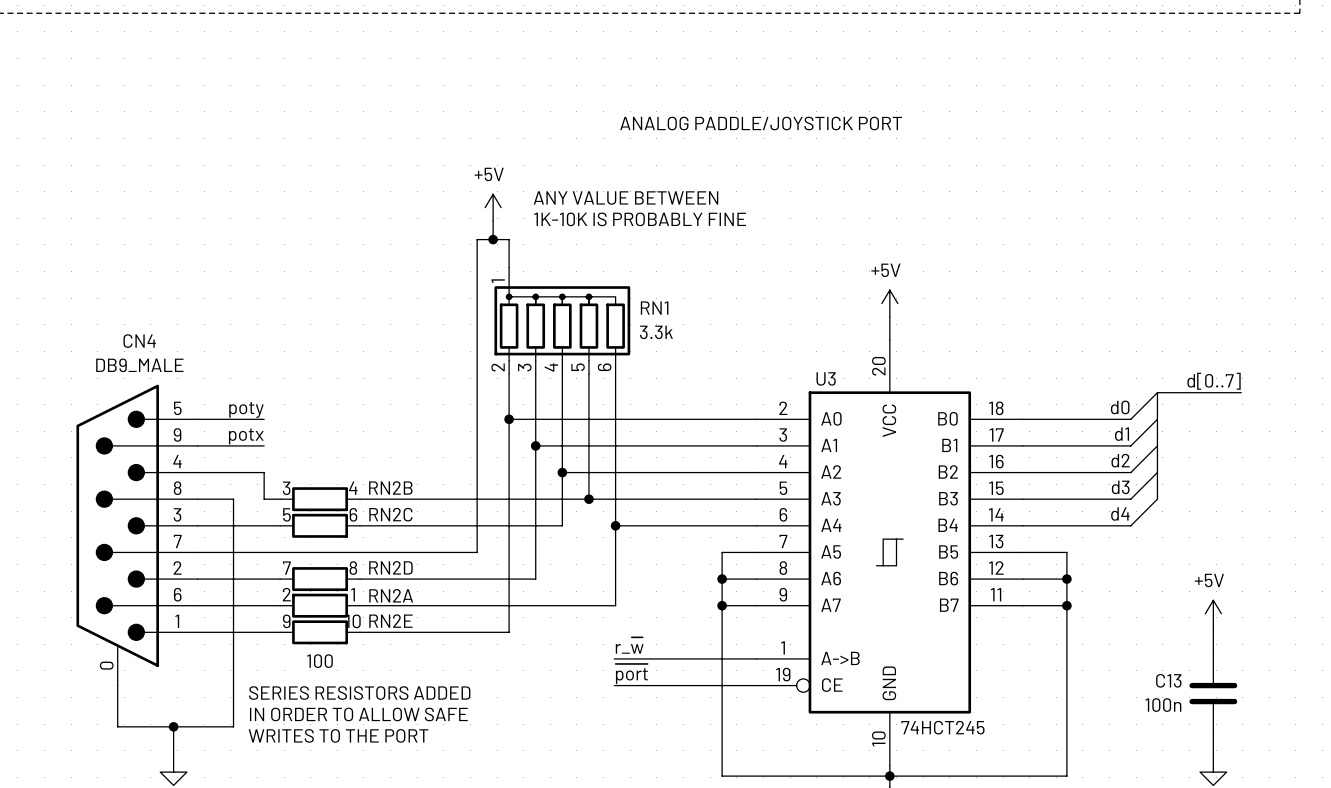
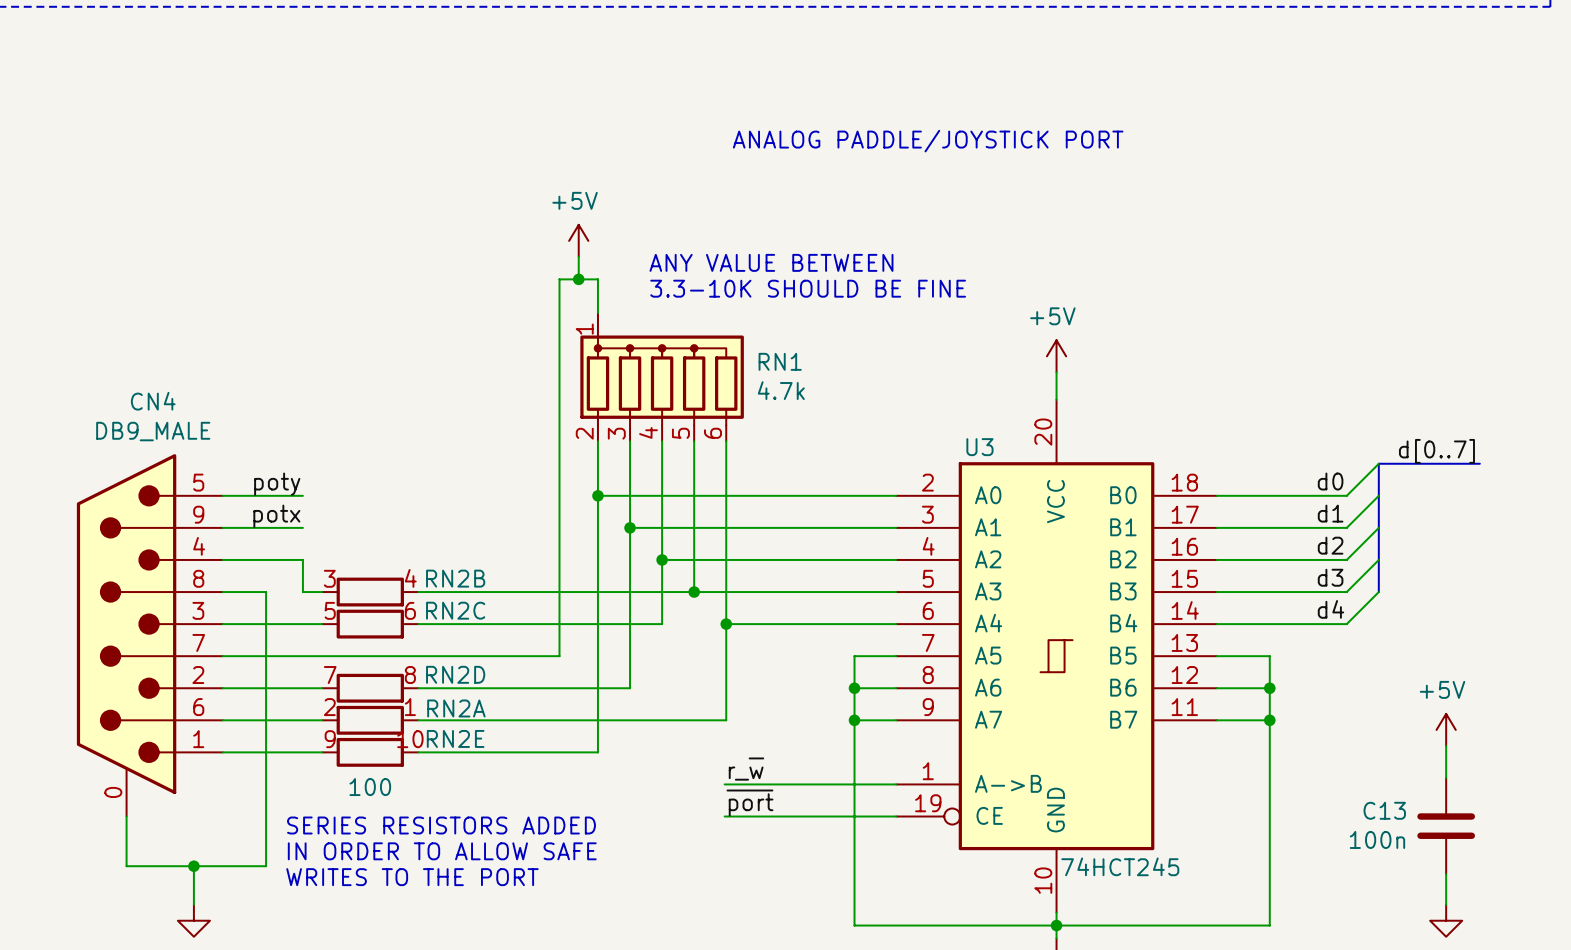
text position: ANY VALUE BETWEEN (625, 198) -> ANY VALUE BETWEEN (771, 262)
text: 1K-10K IS PROBABLY FINE (640, 219) -> none
text: none -> 3.3-10K SHOULD BE FINE (808, 288)
RN1 value: 3.3k (656, 332) -> 4.7k (781, 390)

